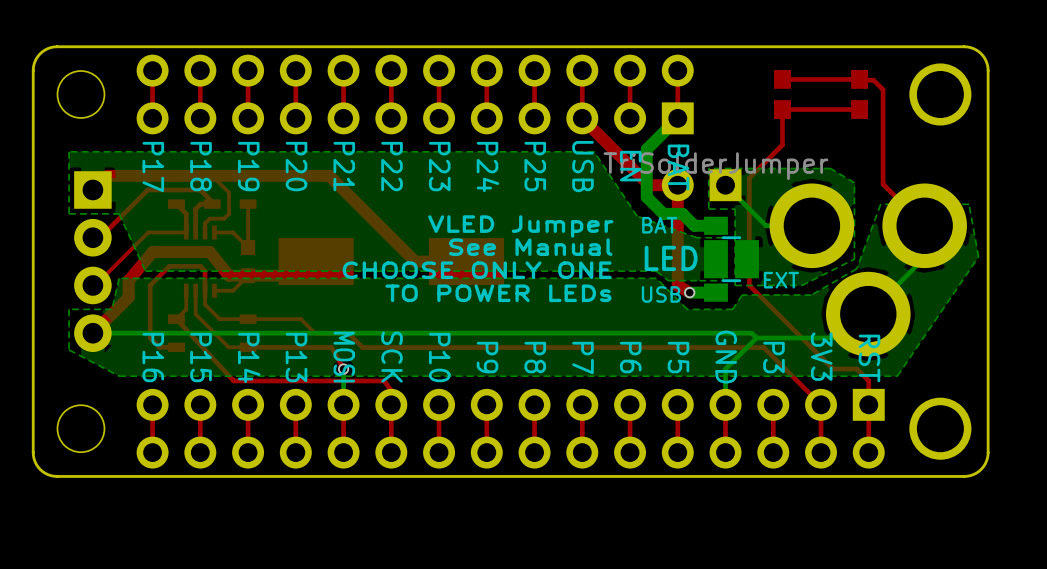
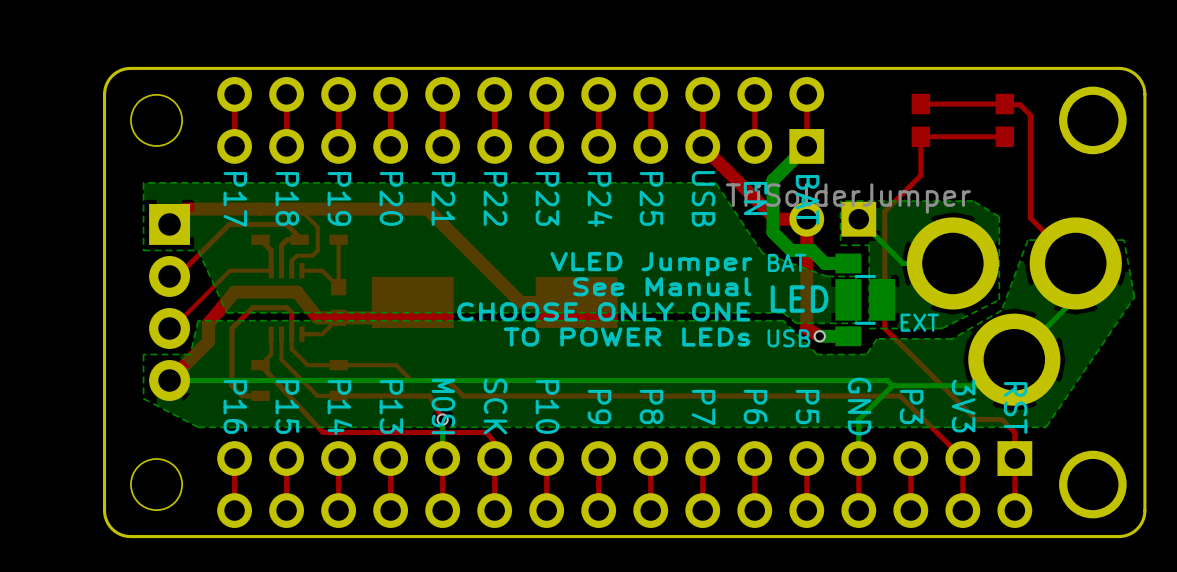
text position: VLED Jumper (520, 226) -> VLED Jumper (651, 264)
text position: See Manual (530, 247) -> See Manual (662, 286)
text position: CHOOSE ONLY ONE (477, 270) -> CHOOSE ONLY ONE (603, 311)
text position: TO POWER LEDs (498, 293) -> TO POWER LEDs (627, 336)

